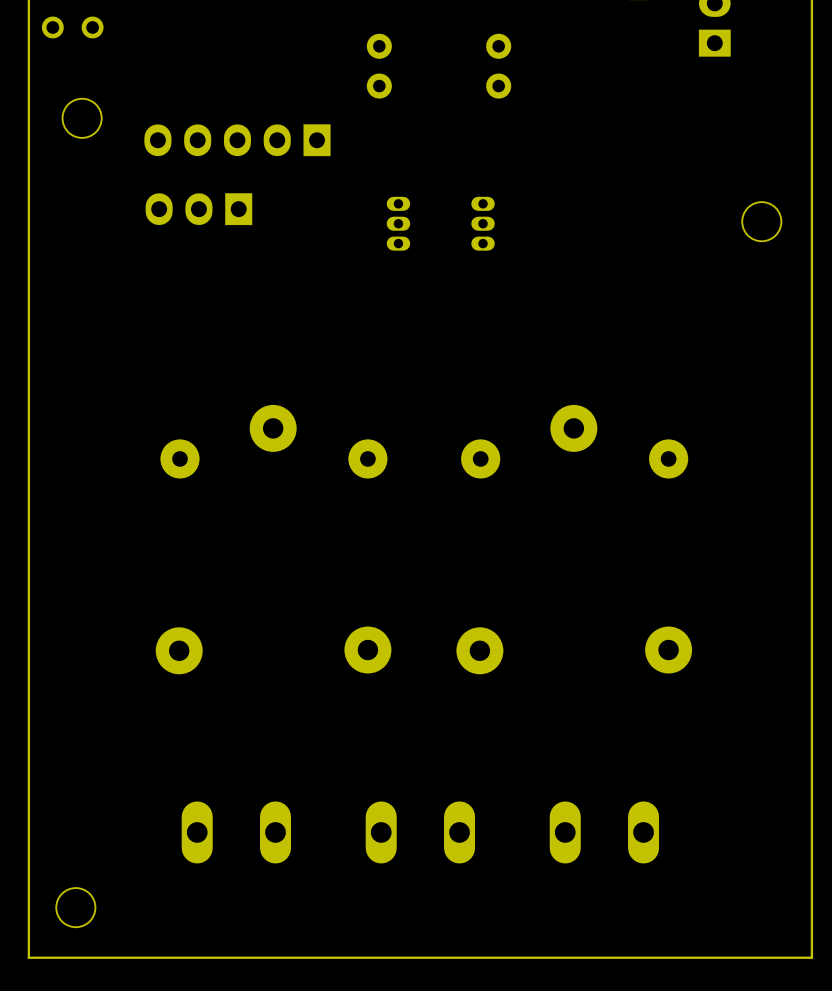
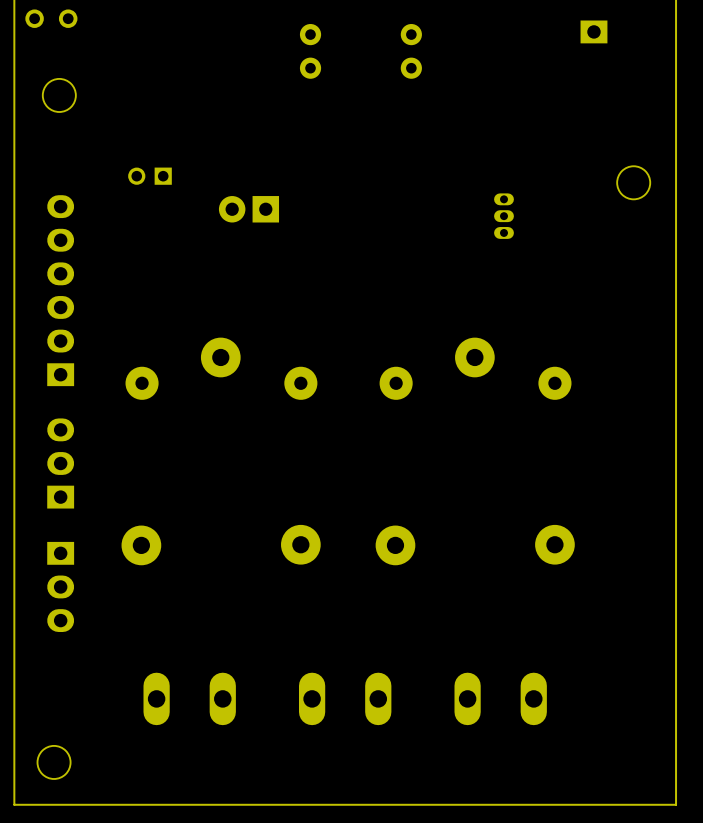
part: (237, 140) -> none
part footprint: [145, 193, 253, 226] -> [128, 167, 172, 185]
part: (398, 223) -> none
part: (483, 223) -> none
part: none -> (248, 209)
part: none -> (503, 216)
part: none -> (60, 290)
part: none -> (60, 463)
part: none -> (60, 586)

